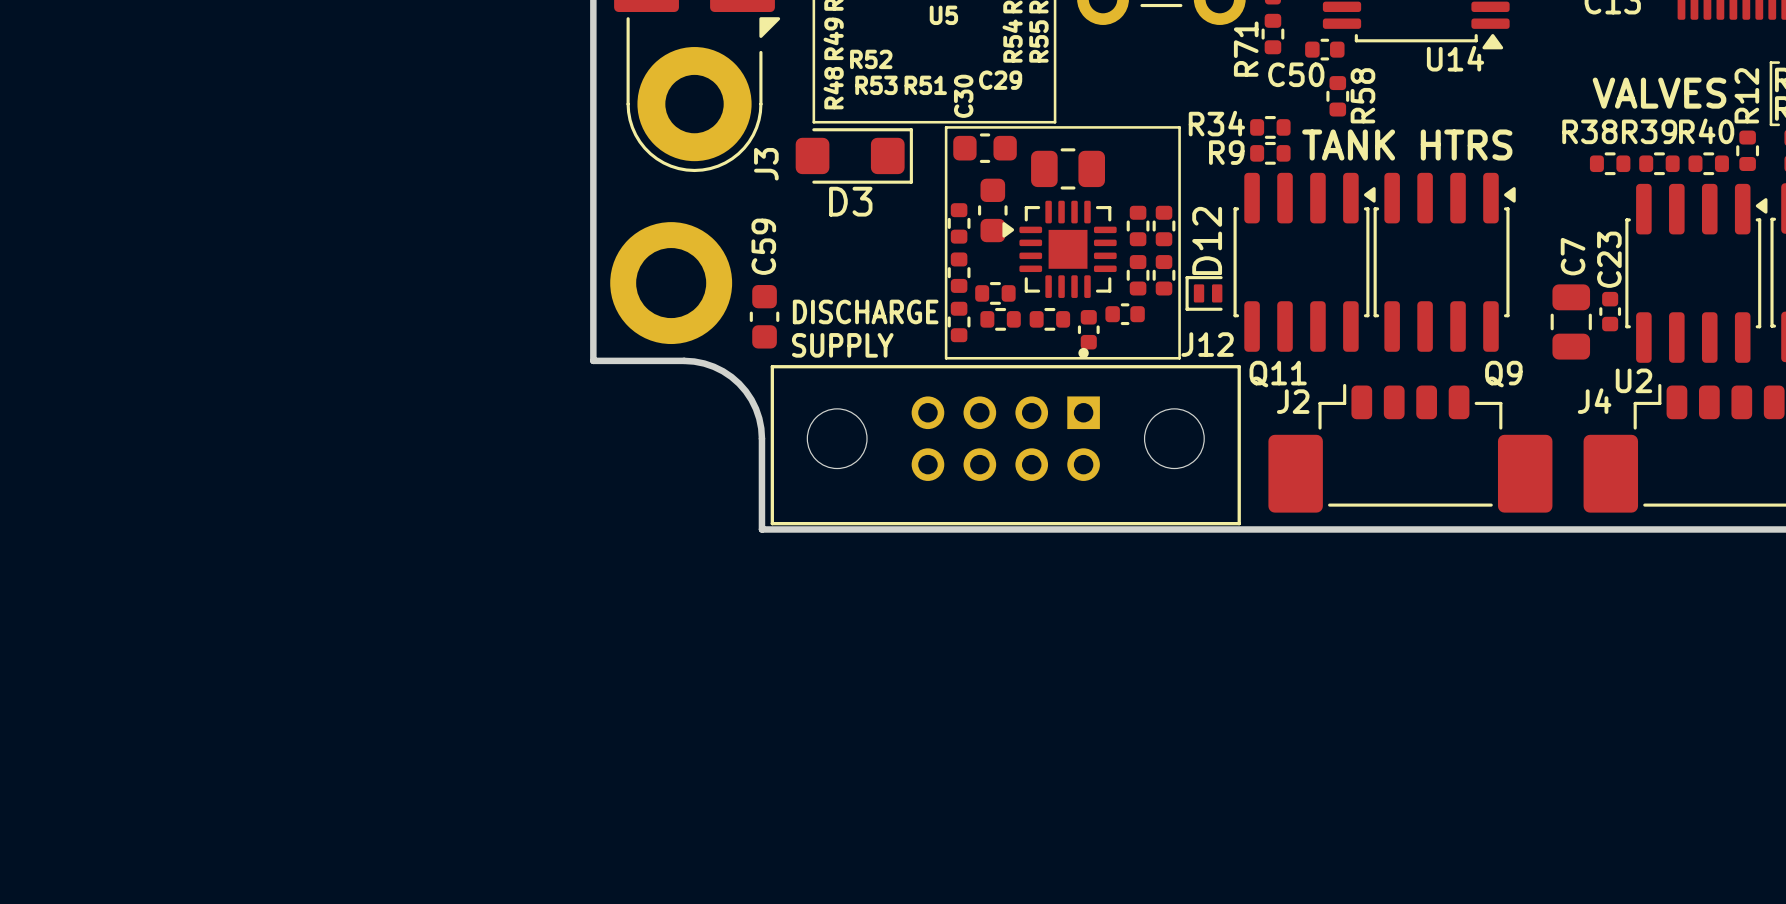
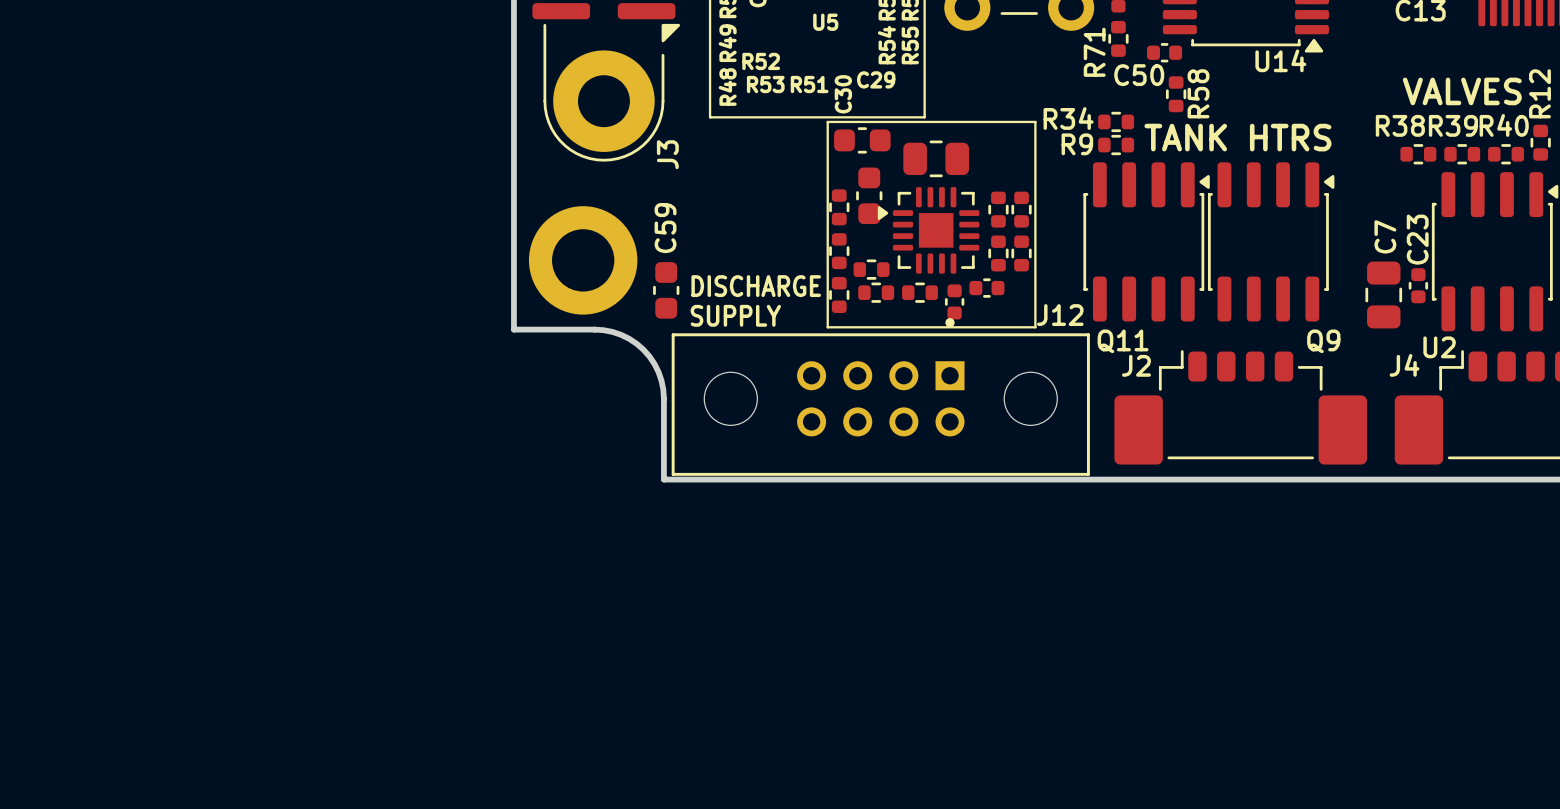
D3: (854, 155) -> none
D12: (1204, 293) -> none

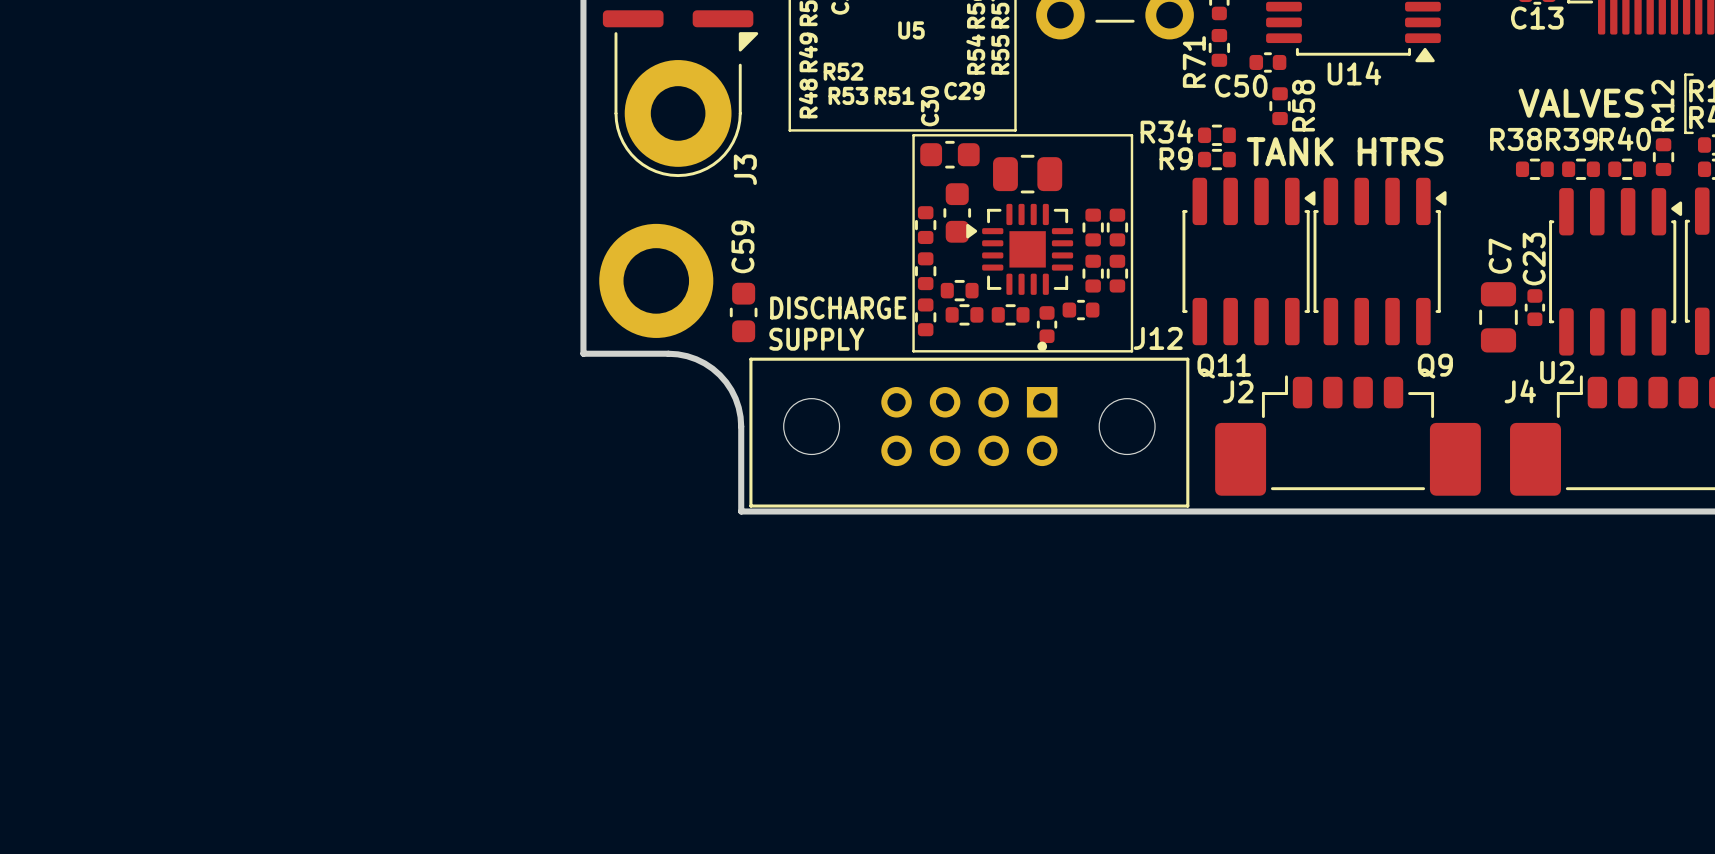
U14 name position: U14 (1280, 60) -> U14 (1354, 73)

